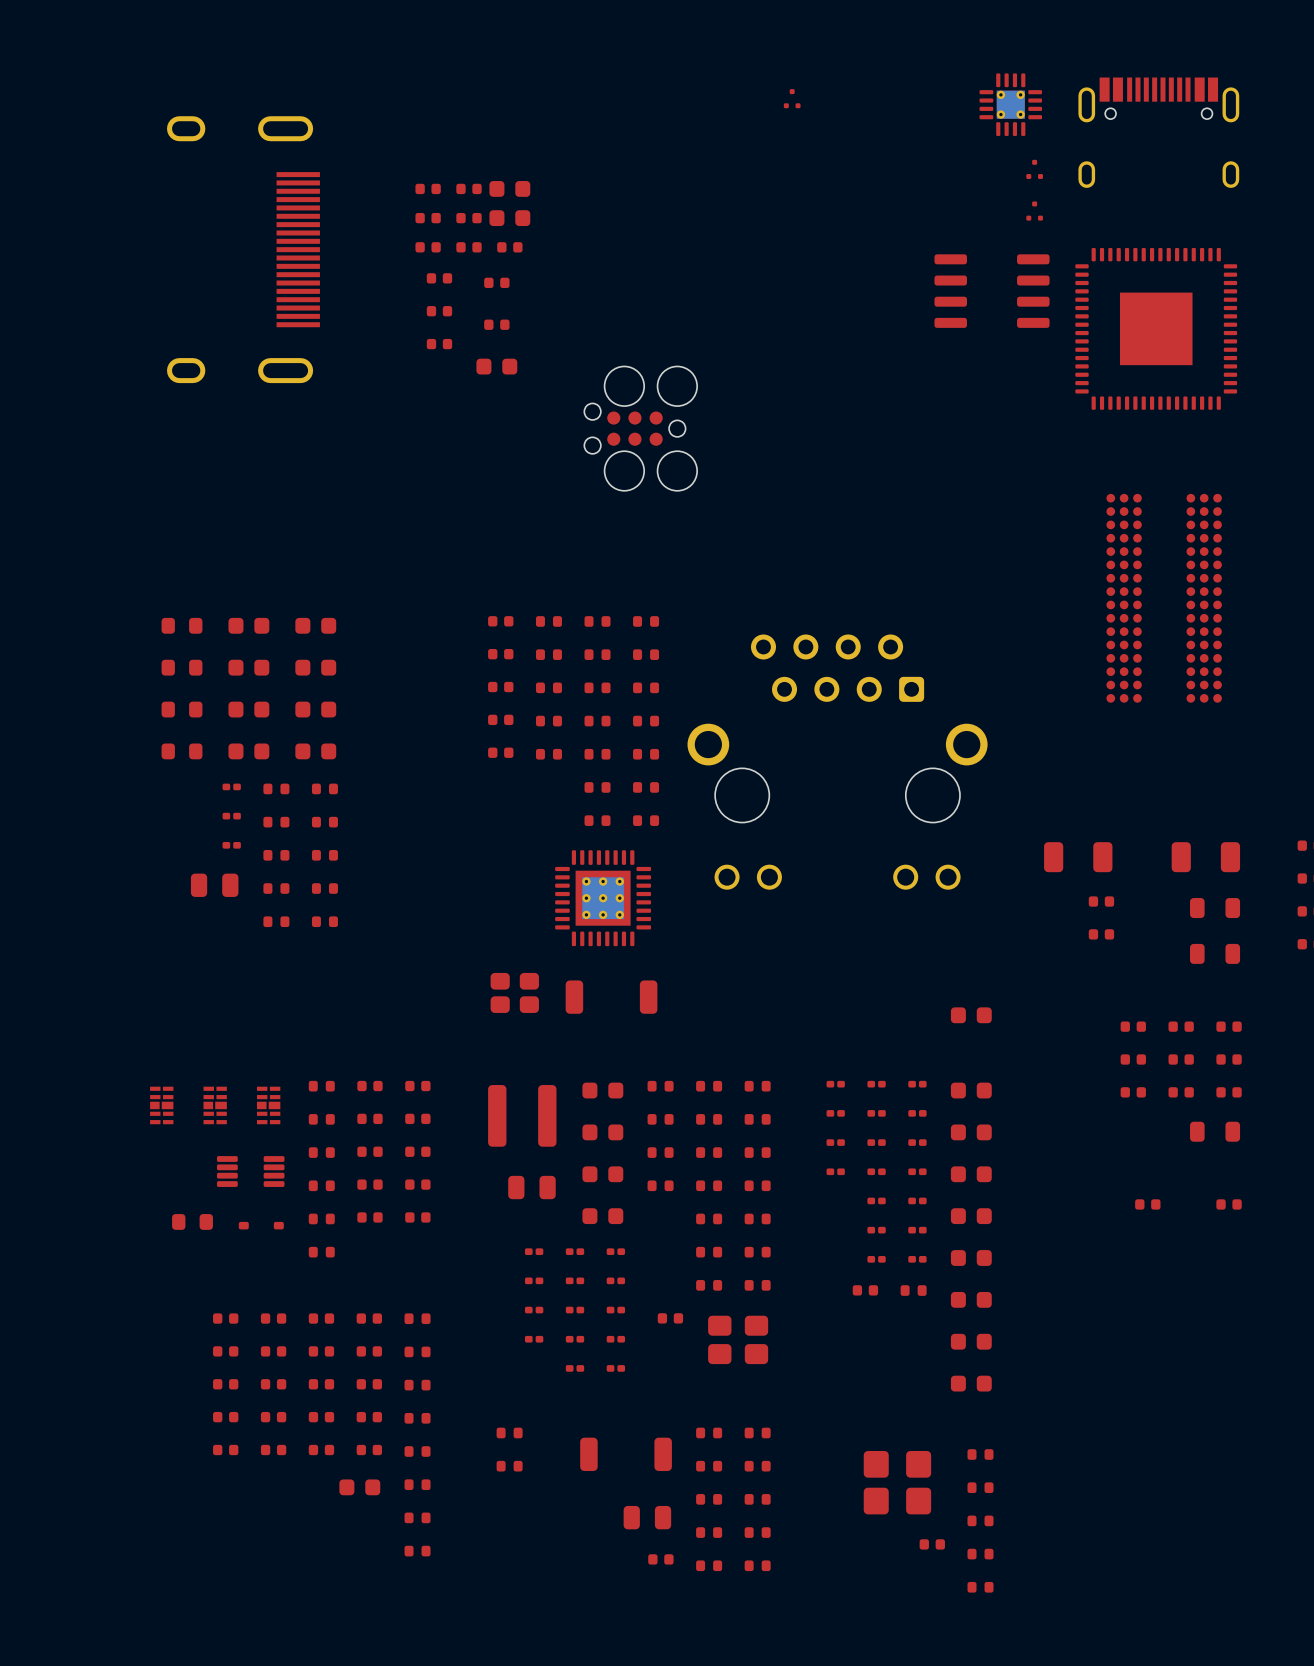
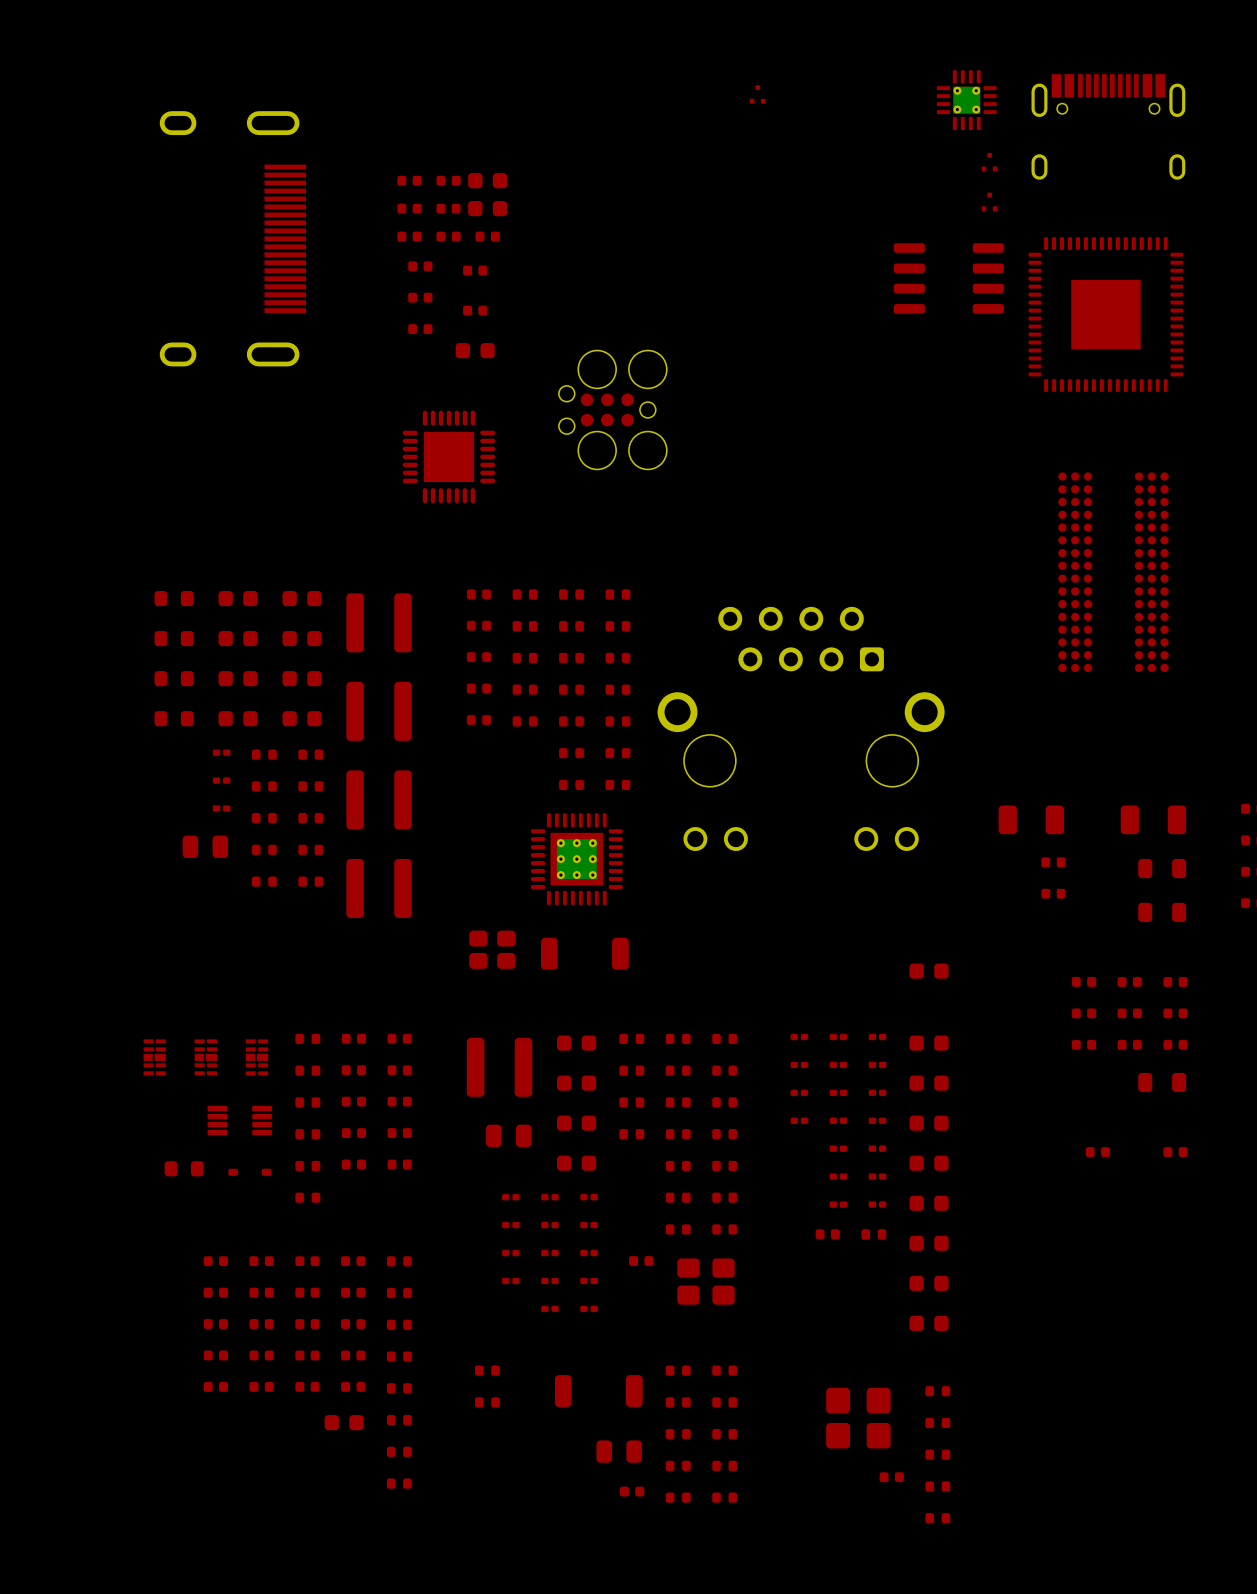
part: none -> (448, 456)
part: none -> (379, 622)
part: none -> (379, 711)
part: none -> (379, 799)
part: none -> (379, 888)

